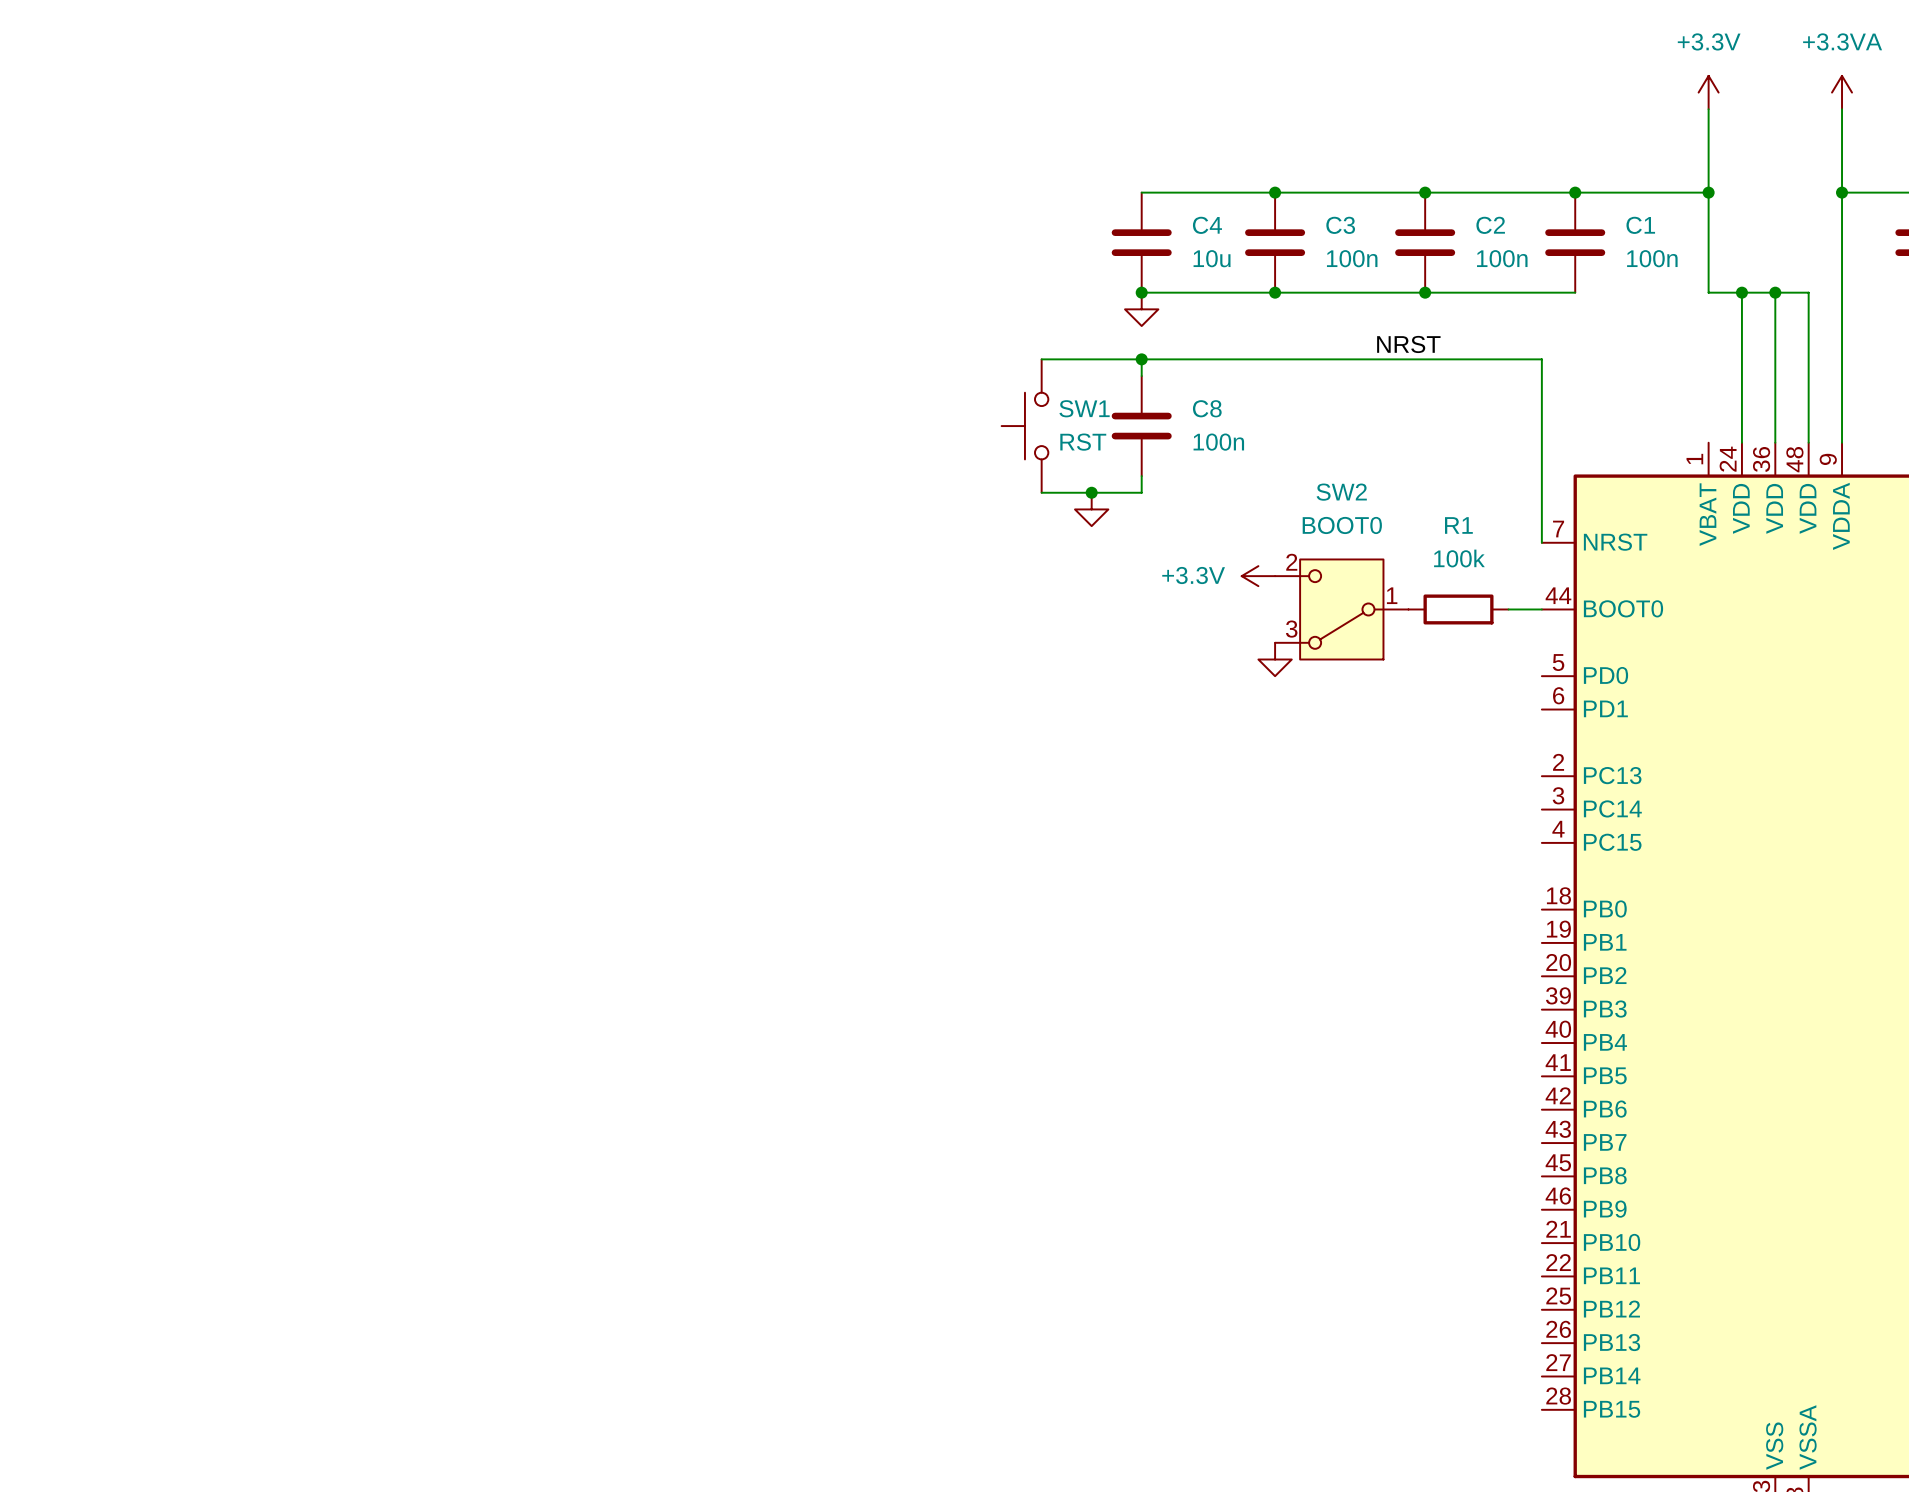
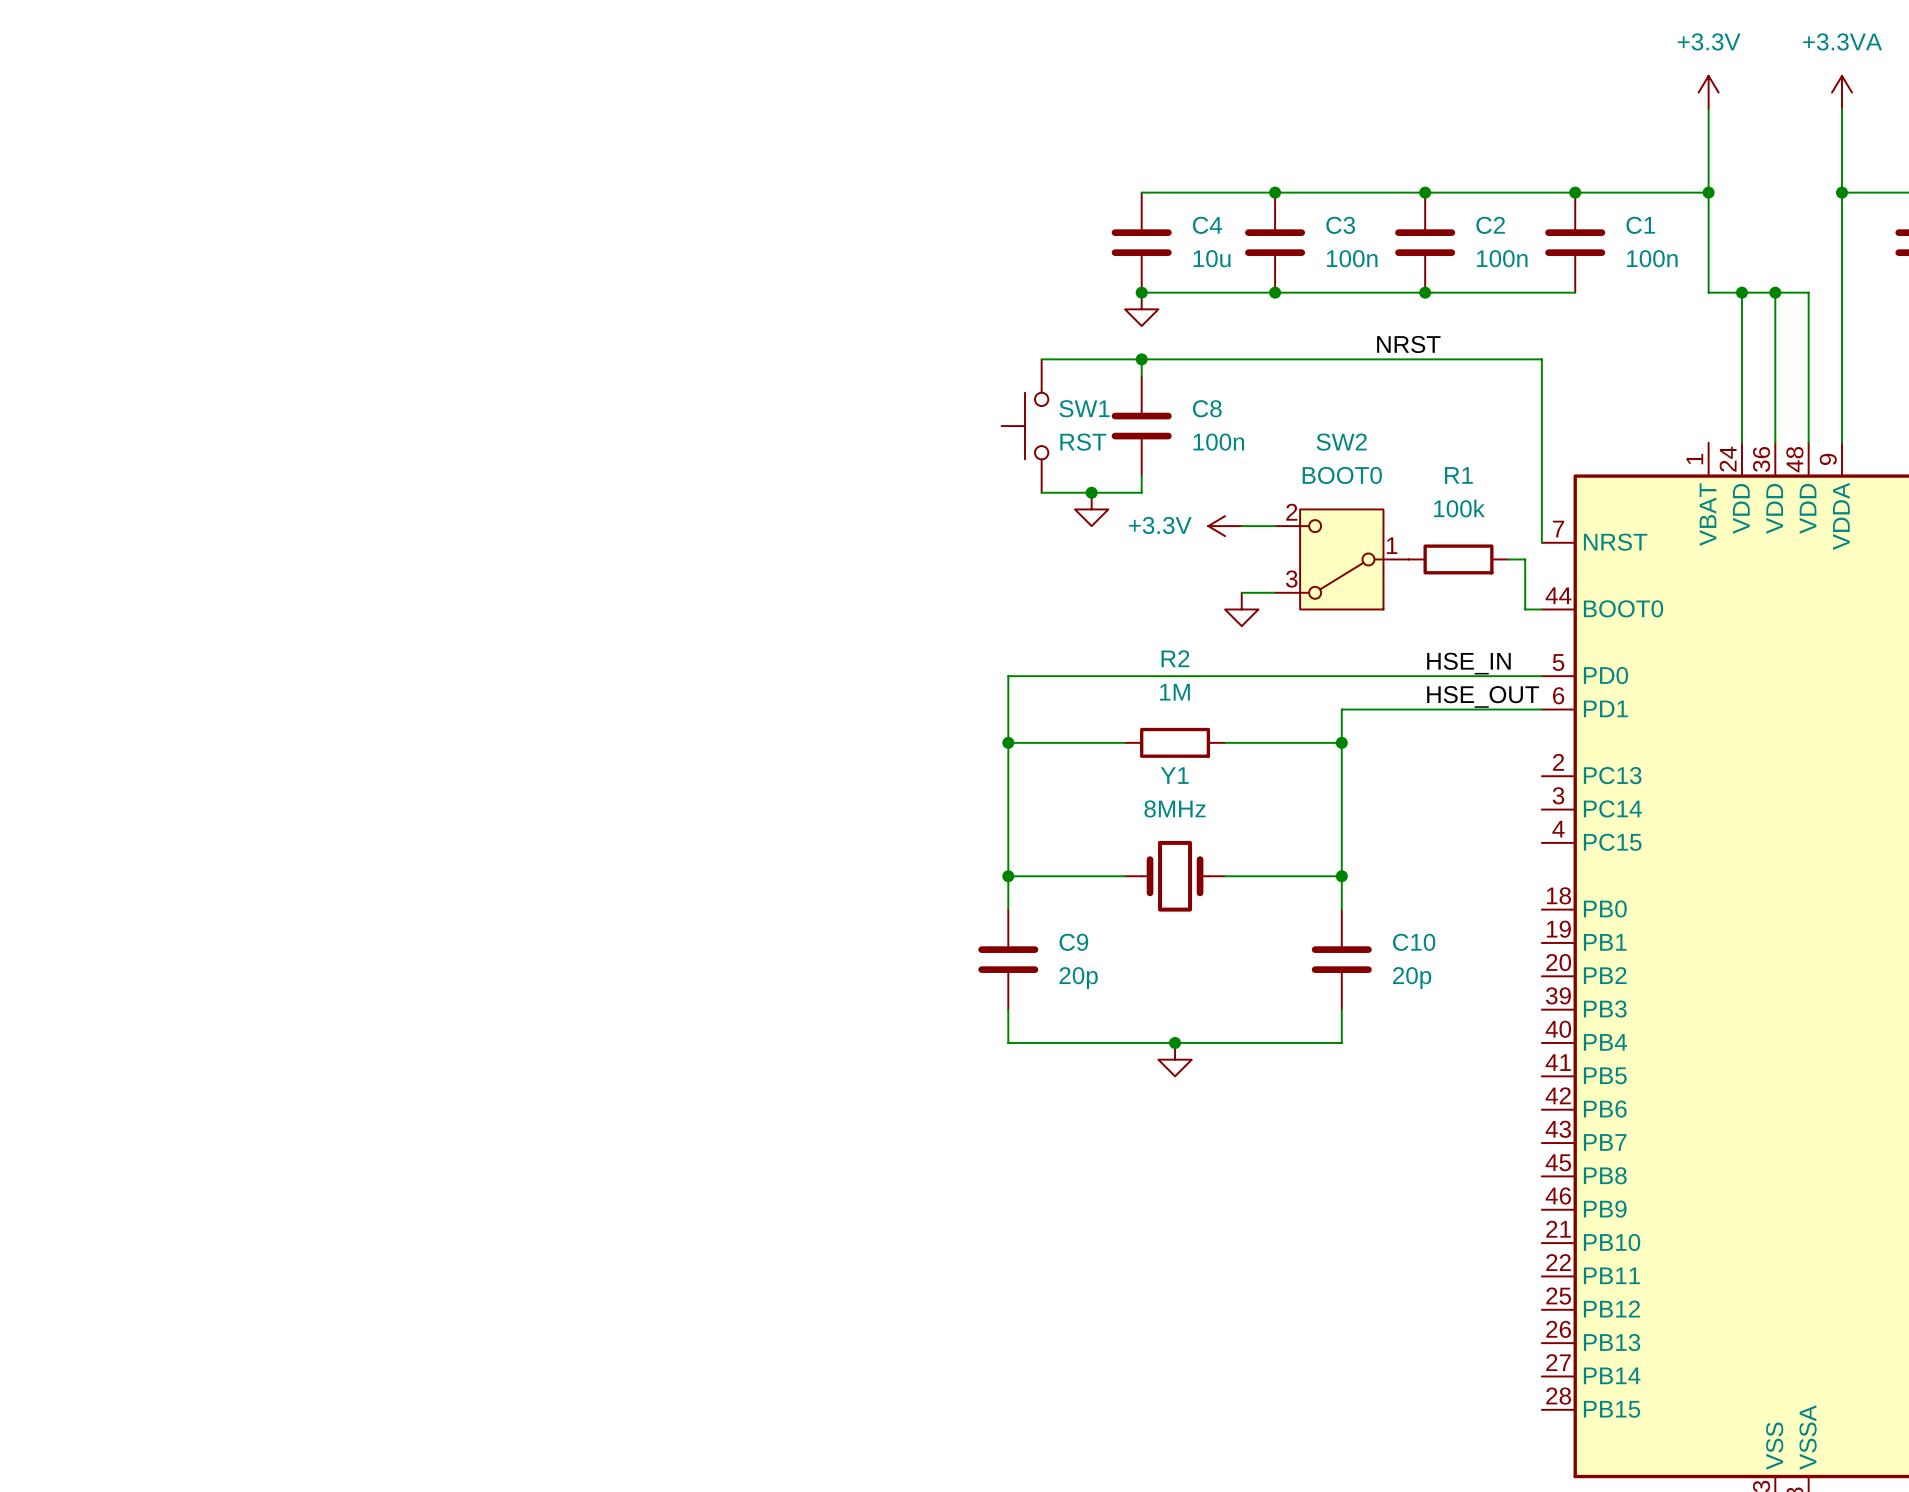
wire: none -> (1241, 526) (1275, 526)
power symbol position: +3.3V (1258, 576) -> +3.3V (1225, 526)
wire: none -> (1241, 592) (1275, 592)
SW2 position: (1341, 609) -> (1341, 559)
R1 position: (1458, 609) -> (1458, 559)
wire: (1508, 609) (1525, 609) -> (1508, 559) (1525, 559) (1525, 609)
power symbol position: (1275, 659) -> (1241, 609)
label: none -> HSE_IN (1468, 663)
wire: none -> (1541, 676) (1008, 676) (1008, 909)
label: none -> HSE_OUT (1483, 696)
wire: none -> (1541, 709) (1341, 709) (1341, 909)
wire: none -> (1008, 742) (1125, 742)
junction: none -> (1008, 742)
R2: none -> 1M (1175, 742)
wire: none -> (1225, 742) (1341, 742)
junction: none -> (1341, 742)
wire: none -> (1008, 876) (1125, 876)
junction: none -> (1008, 876)
Y1: none -> 8MHz (1175, 876)
wire: none -> (1225, 876) (1341, 876)
junction: none -> (1341, 876)
C9: none -> 20p (1008, 959)
C10: none -> 20p (1341, 959)
wire: none -> (1008, 1009) (1008, 1043) (1341, 1043) (1341, 1009)
junction: none -> (1175, 1043)
power symbol: none -> (1175, 1059)

